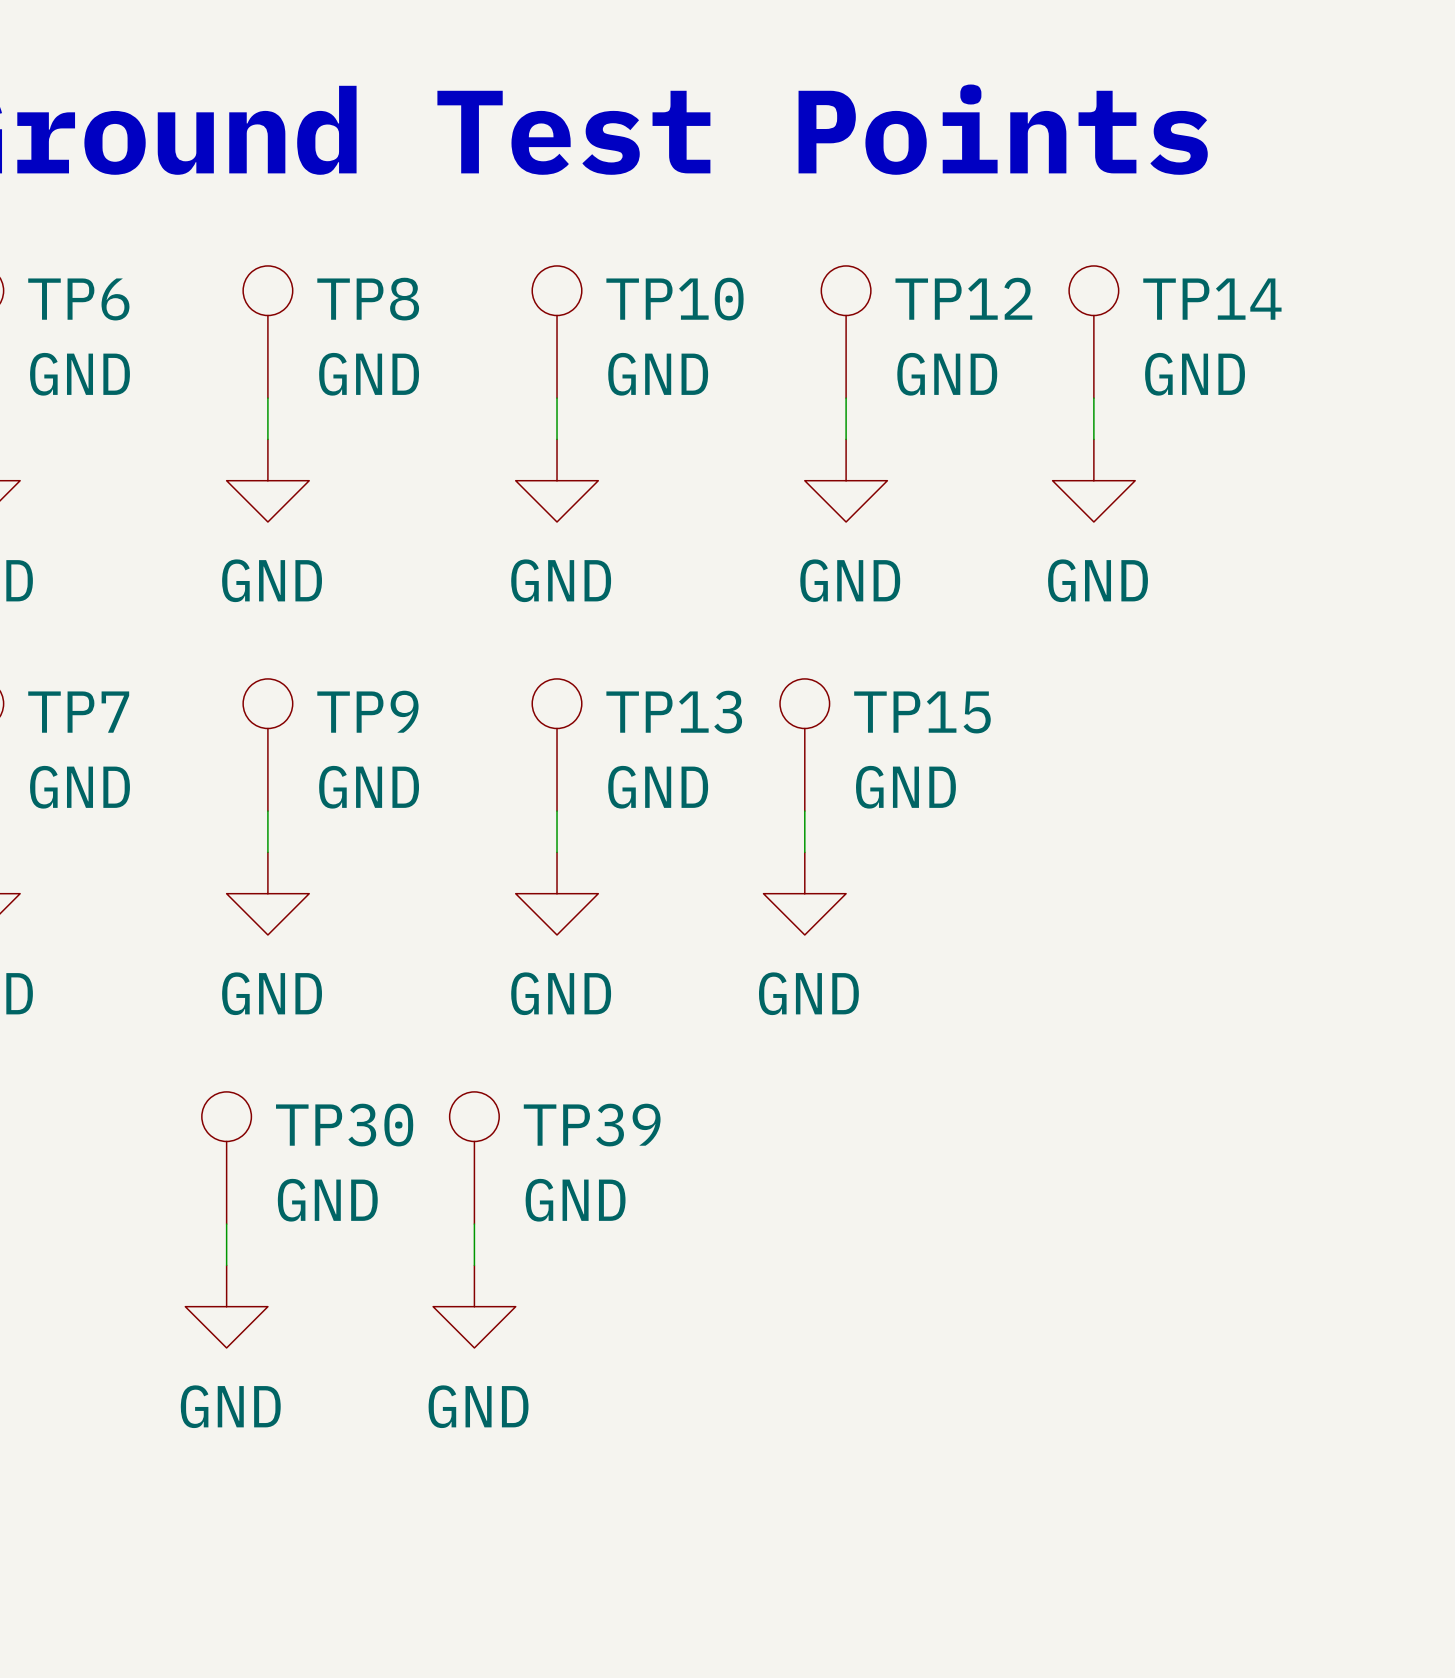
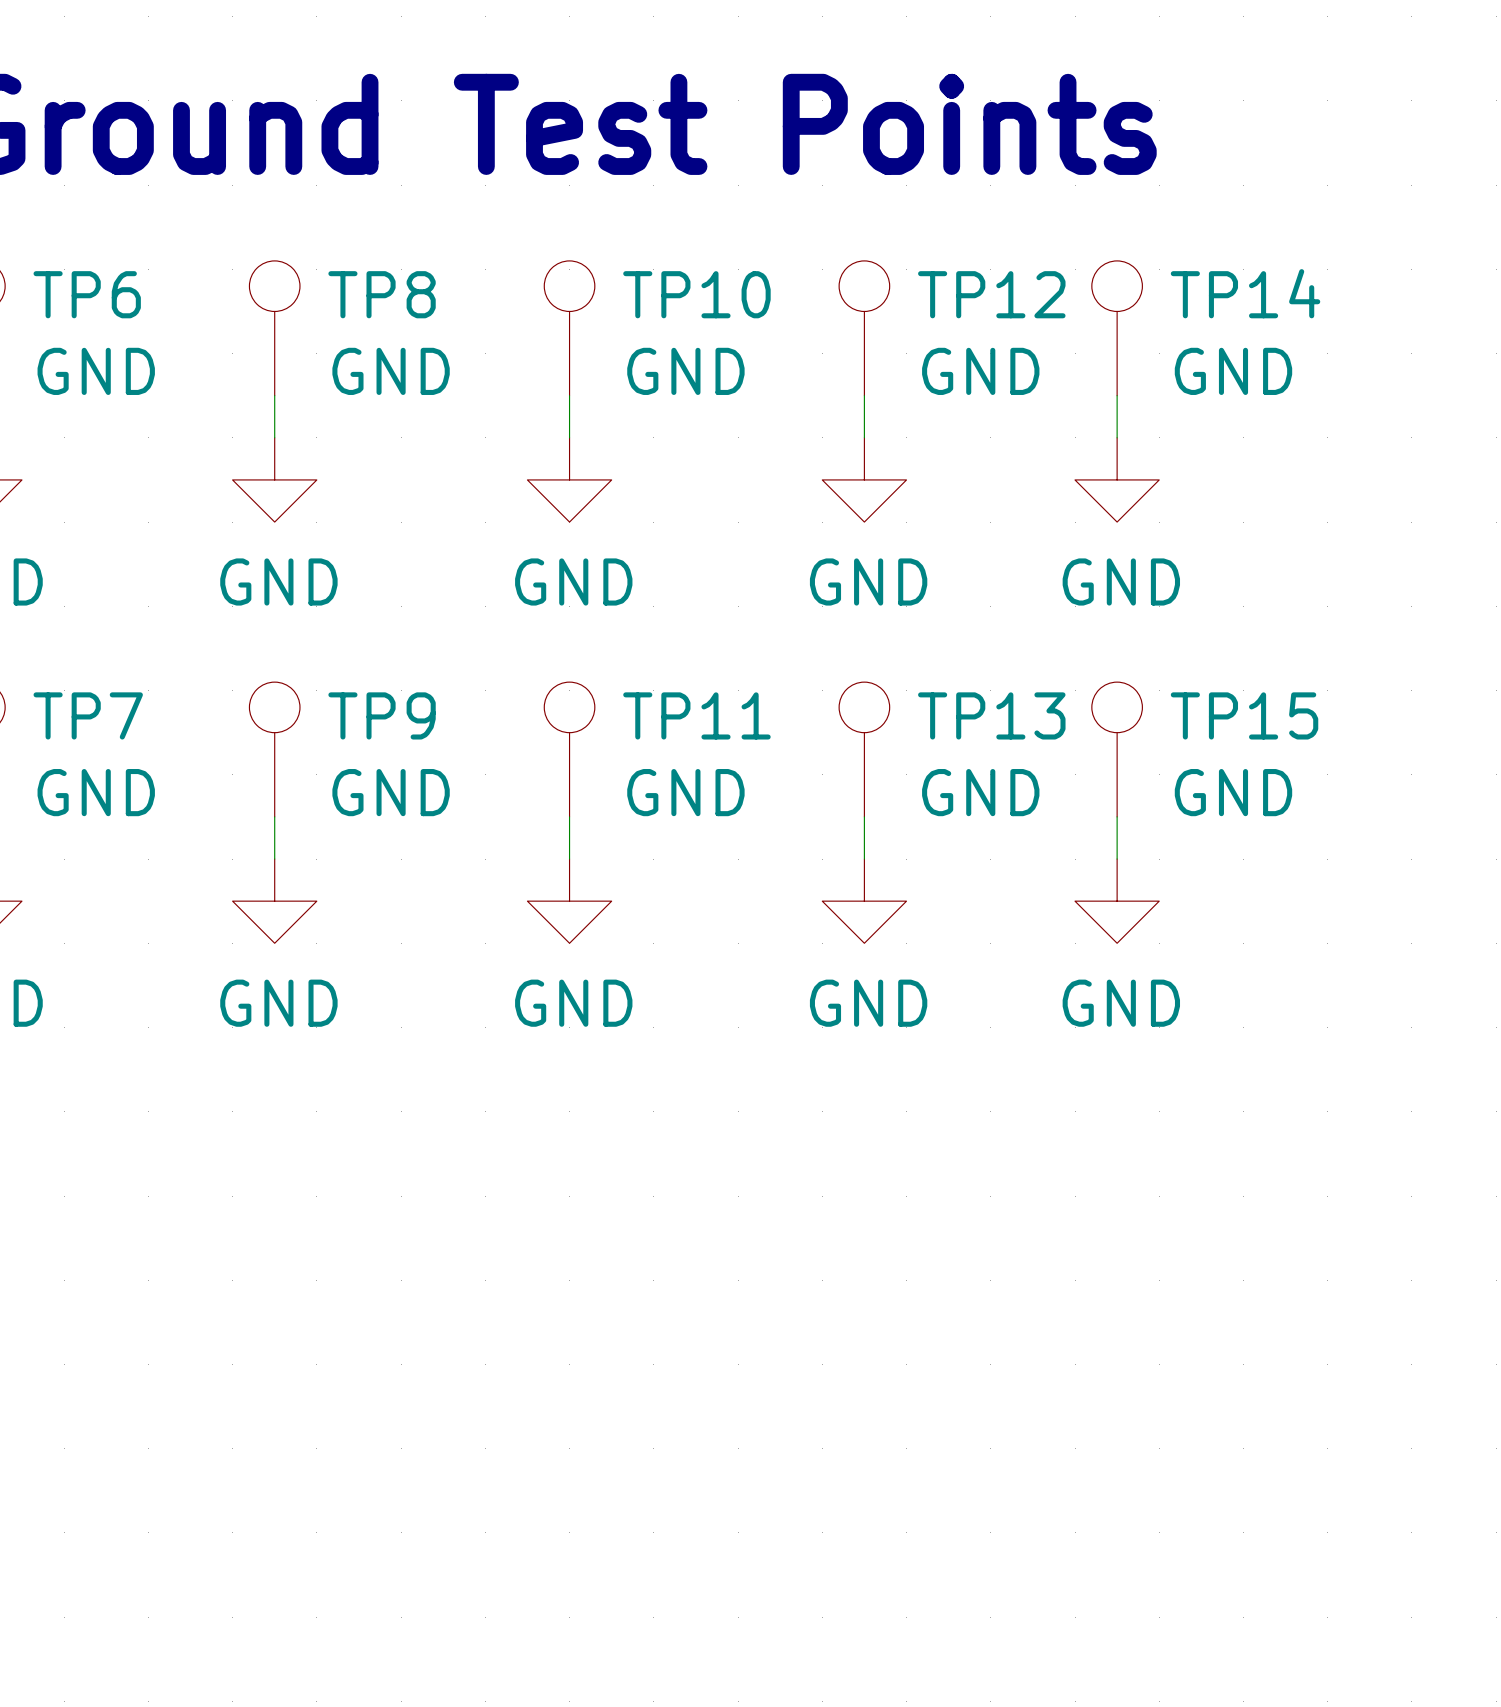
TP13 name: TP13 (674, 712) -> TP11 (696, 715)
TP15 position: (804, 745) -> (1117, 749)
TP13: none -> GND (864, 749)
wire: (804, 811) (804, 852) -> (864, 816) (864, 859)
power symbol position: GND (804, 893) -> GND (864, 901)
power symbol: none -> GND (1117, 901)
TP30: GND (226, 1157) -> none
TP39: GND (474, 1157) -> none
wire: (226, 1224) (226, 1265) -> none
wire: (474, 1224) (474, 1265) -> (1117, 816) (1117, 859)
power symbol: GND (226, 1306) -> none
power symbol: GND (474, 1306) -> none

